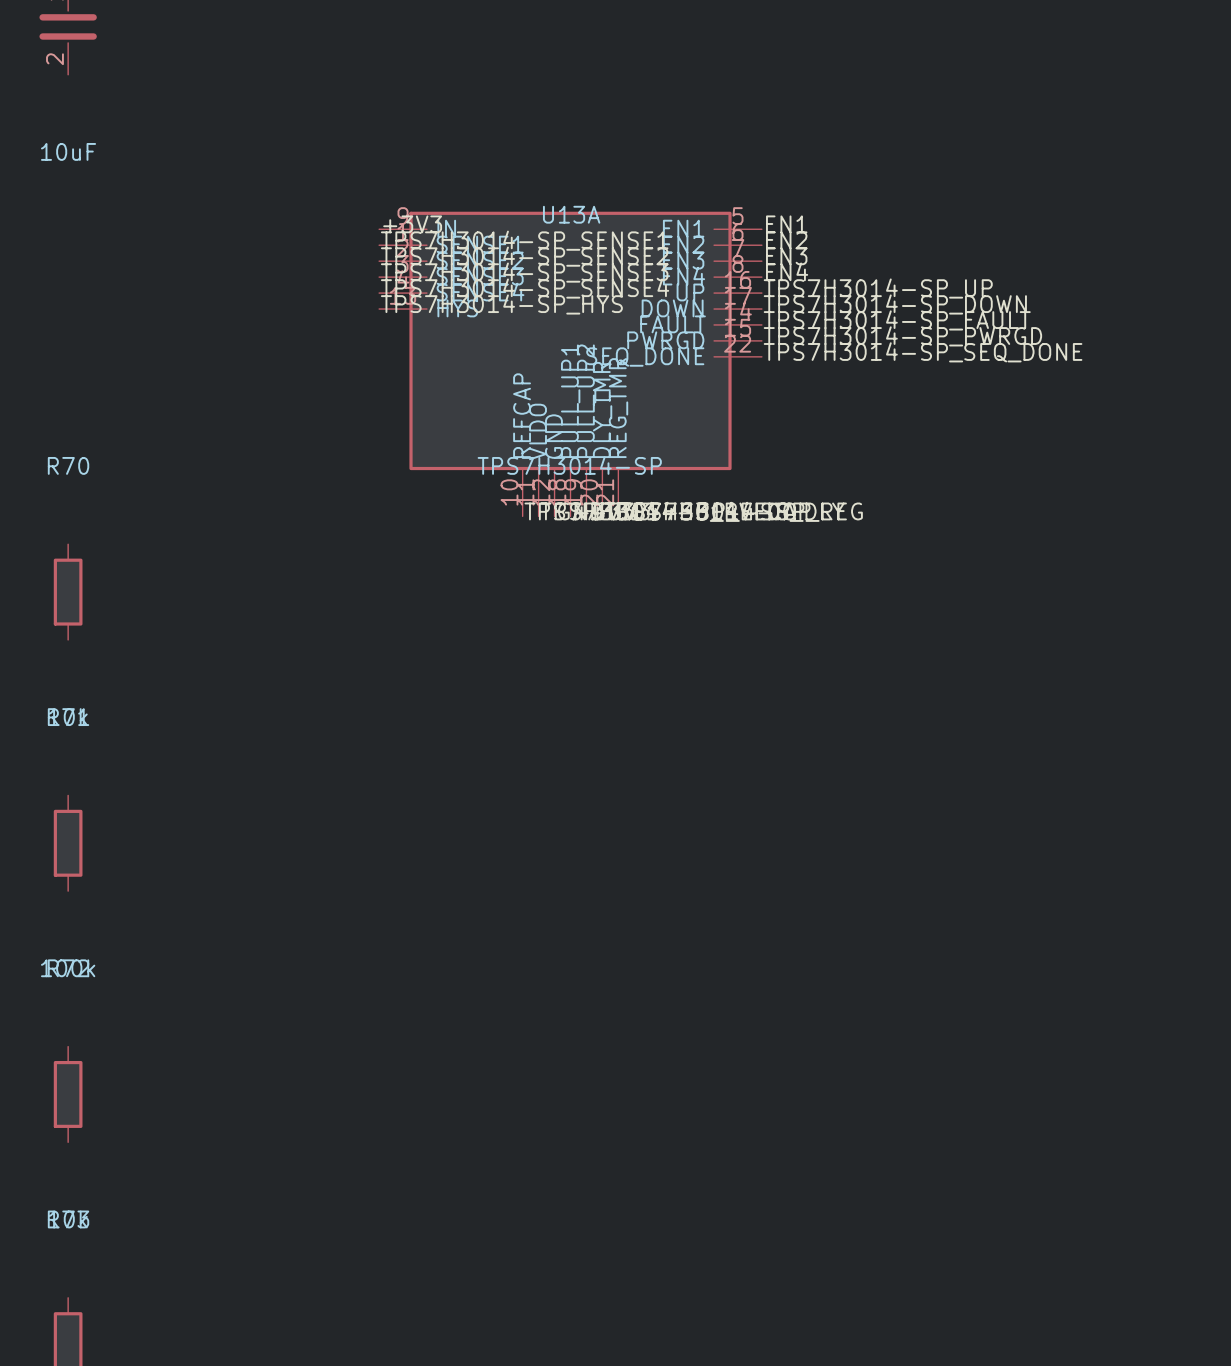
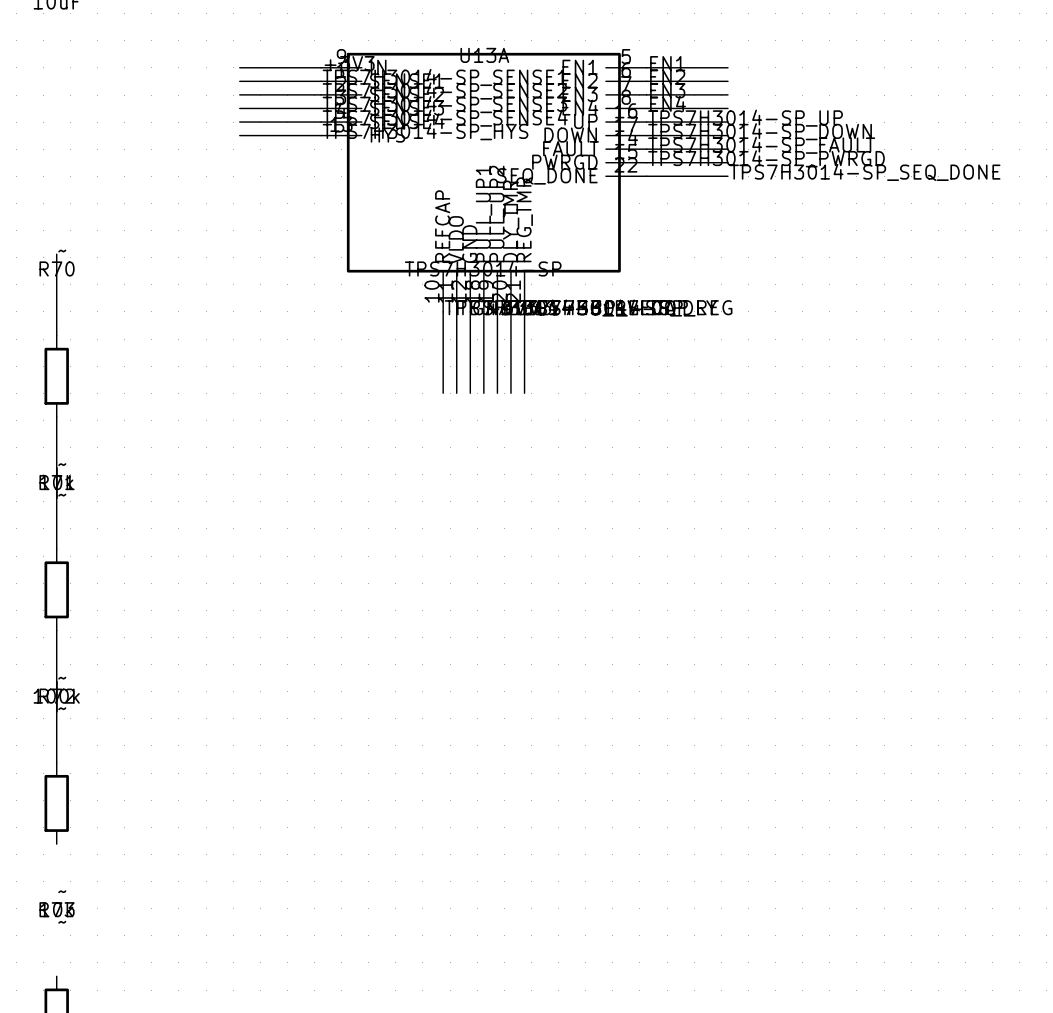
wire: none -> (239, 67) (321, 67)
wire: none -> (646, 67) (727, 67)
wire: none -> (239, 81) (321, 81)
wire: none -> (646, 81) (727, 81)
wire: none -> (239, 94) (321, 94)
wire: none -> (646, 94) (727, 94)
wire: none -> (239, 108) (321, 108)
wire: none -> (646, 108) (727, 108)
wire: none -> (239, 122) (321, 122)
wire: none -> (646, 122) (727, 122)
wire: none -> (239, 135) (321, 135)
wire: none -> (646, 135) (727, 135)
wire: none -> (646, 149) (727, 149)
wire: none -> (646, 162) (727, 162)
label position: TPS7H3014-SP_SEQ_DONE (923, 352) -> TPS7H3014-SP_SEQ_DONE (864, 172)
wire: none -> (646, 176) (727, 176)
label: none -> ~ (62, 251)
wire: none -> (56, 254) (56, 335)
wire: none -> (443, 311) (443, 393)
wire: none -> (456, 311) (456, 393)
wire: none -> (470, 311) (470, 393)
wire: none -> (483, 311) (483, 393)
wire: none -> (497, 311) (497, 393)
wire: none -> (510, 311) (510, 393)
wire: none -> (524, 311) (524, 393)
wire: none -> (56, 416) (56, 549)
label: none -> ~ (62, 464)
label: none -> ~ (62, 495)
wire: none -> (56, 630) (56, 762)
label: none -> ~ (62, 678)
label: none -> ~ (62, 708)
label: none -> ~ (62, 891)
label: none -> ~ (62, 922)

